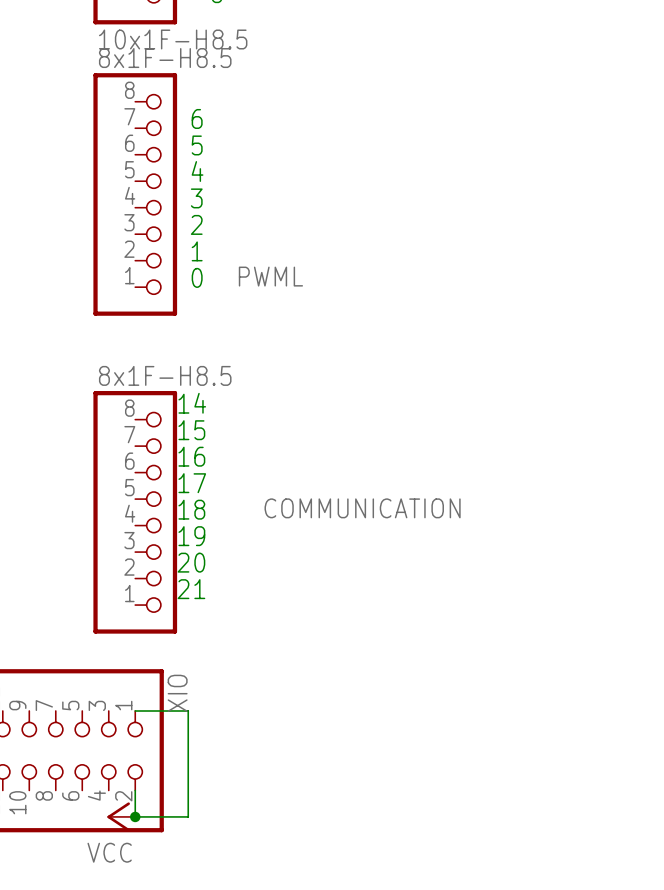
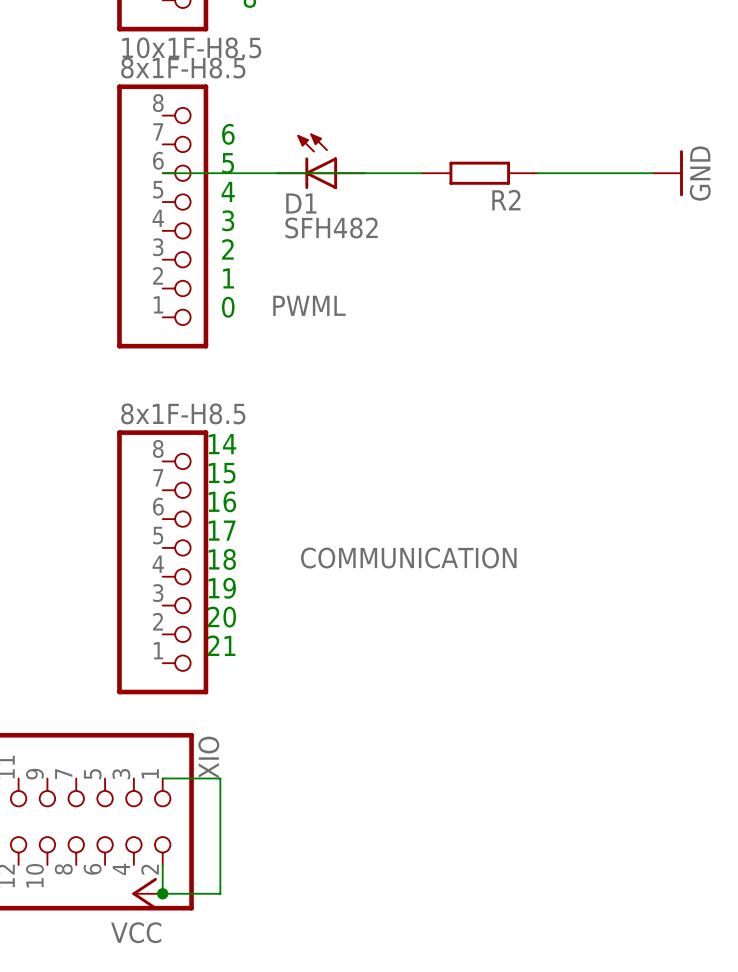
D1: none -> SFH482 (321, 161)
wire: none -> (162, 173) (422, 173)
R2: none -> (479, 173)
wire: none -> (537, 173) (652, 173)
power symbol: none -> GND (667, 173)

